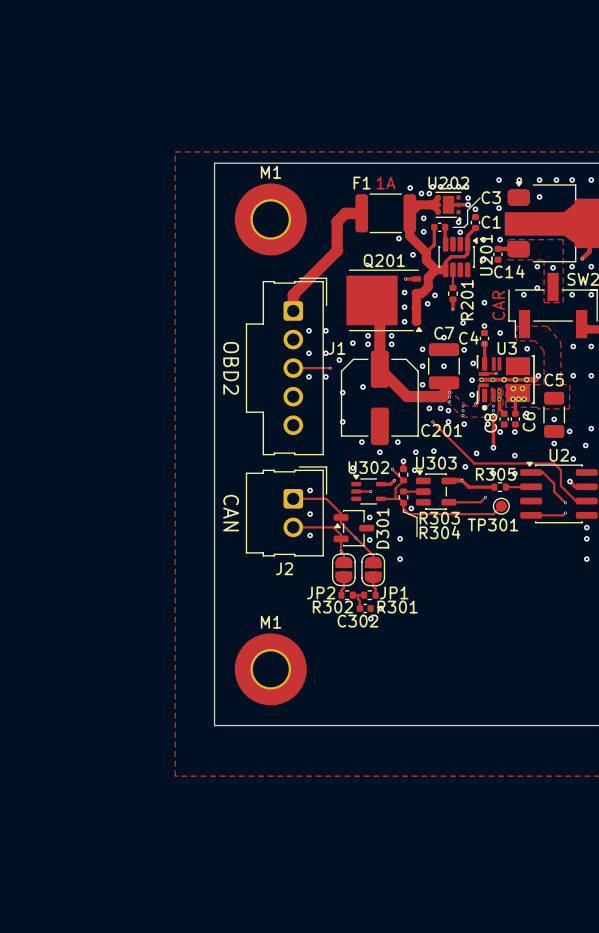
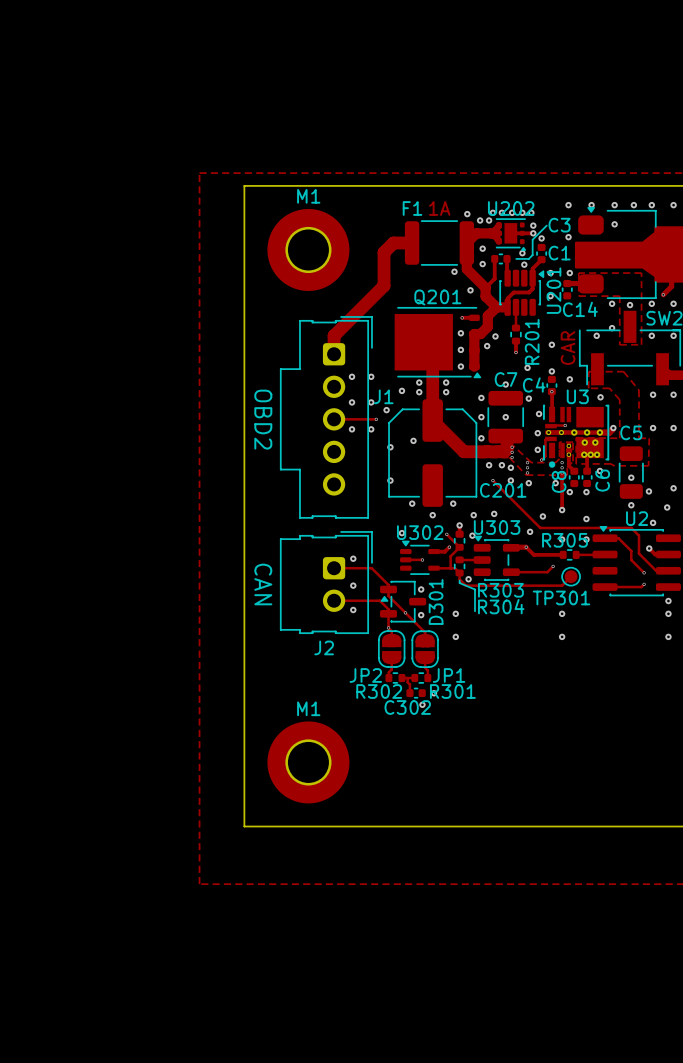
via: none -> (562, 613)
via: none -> (562, 636)

